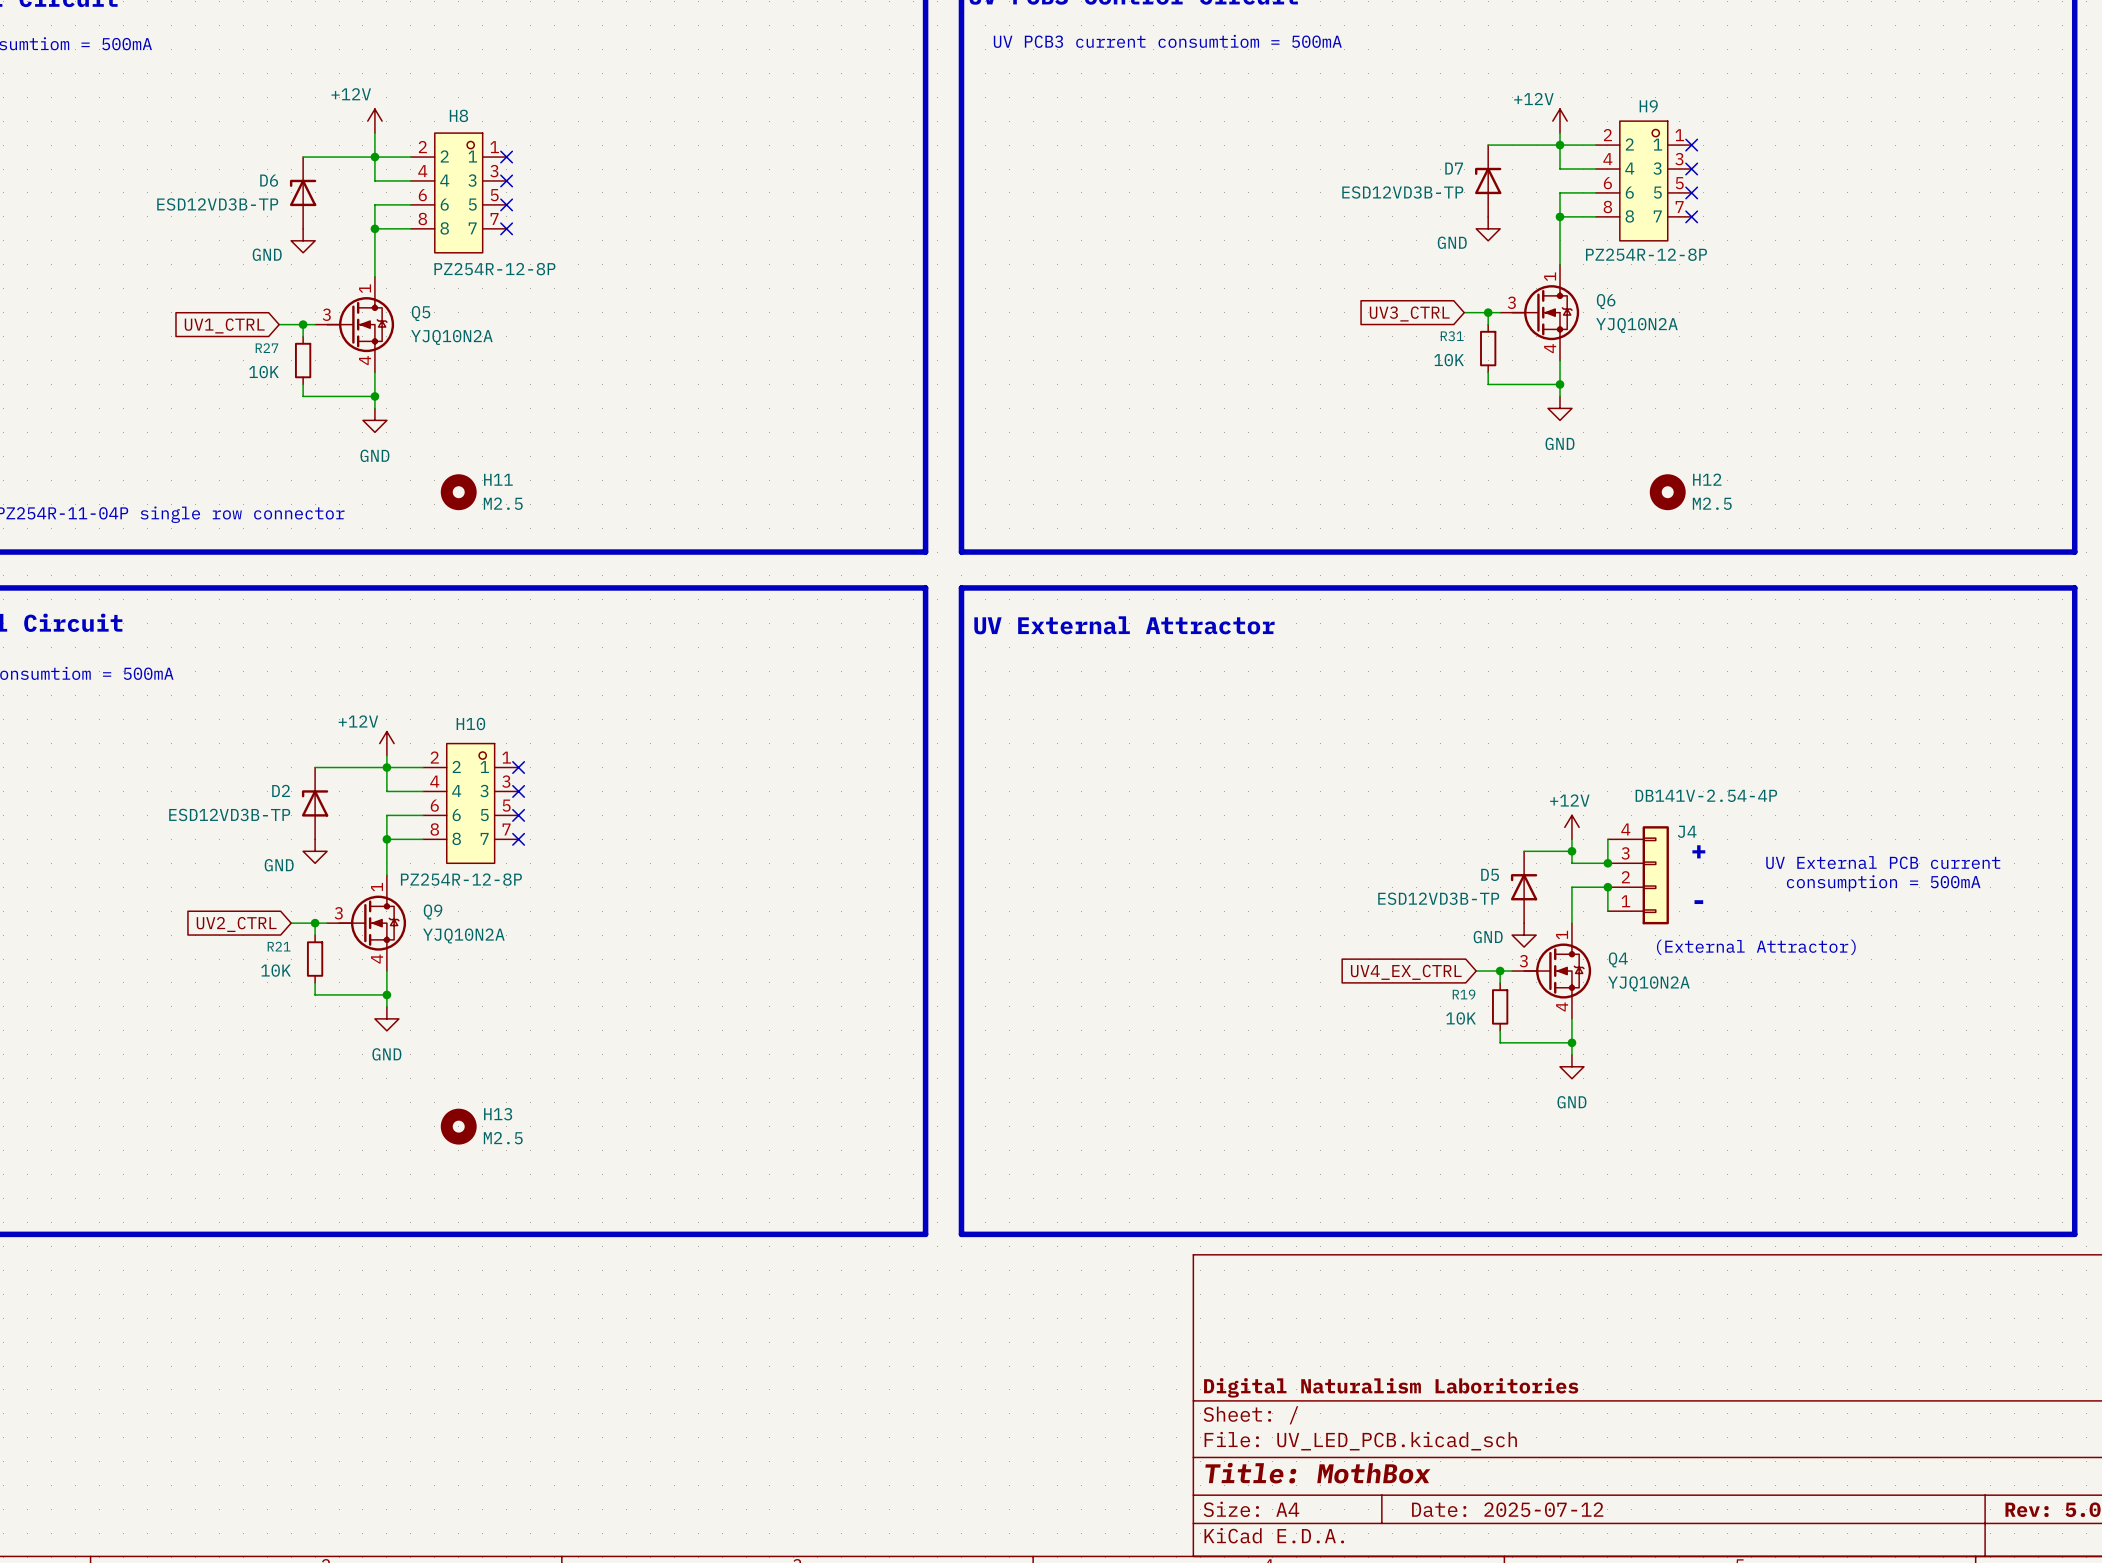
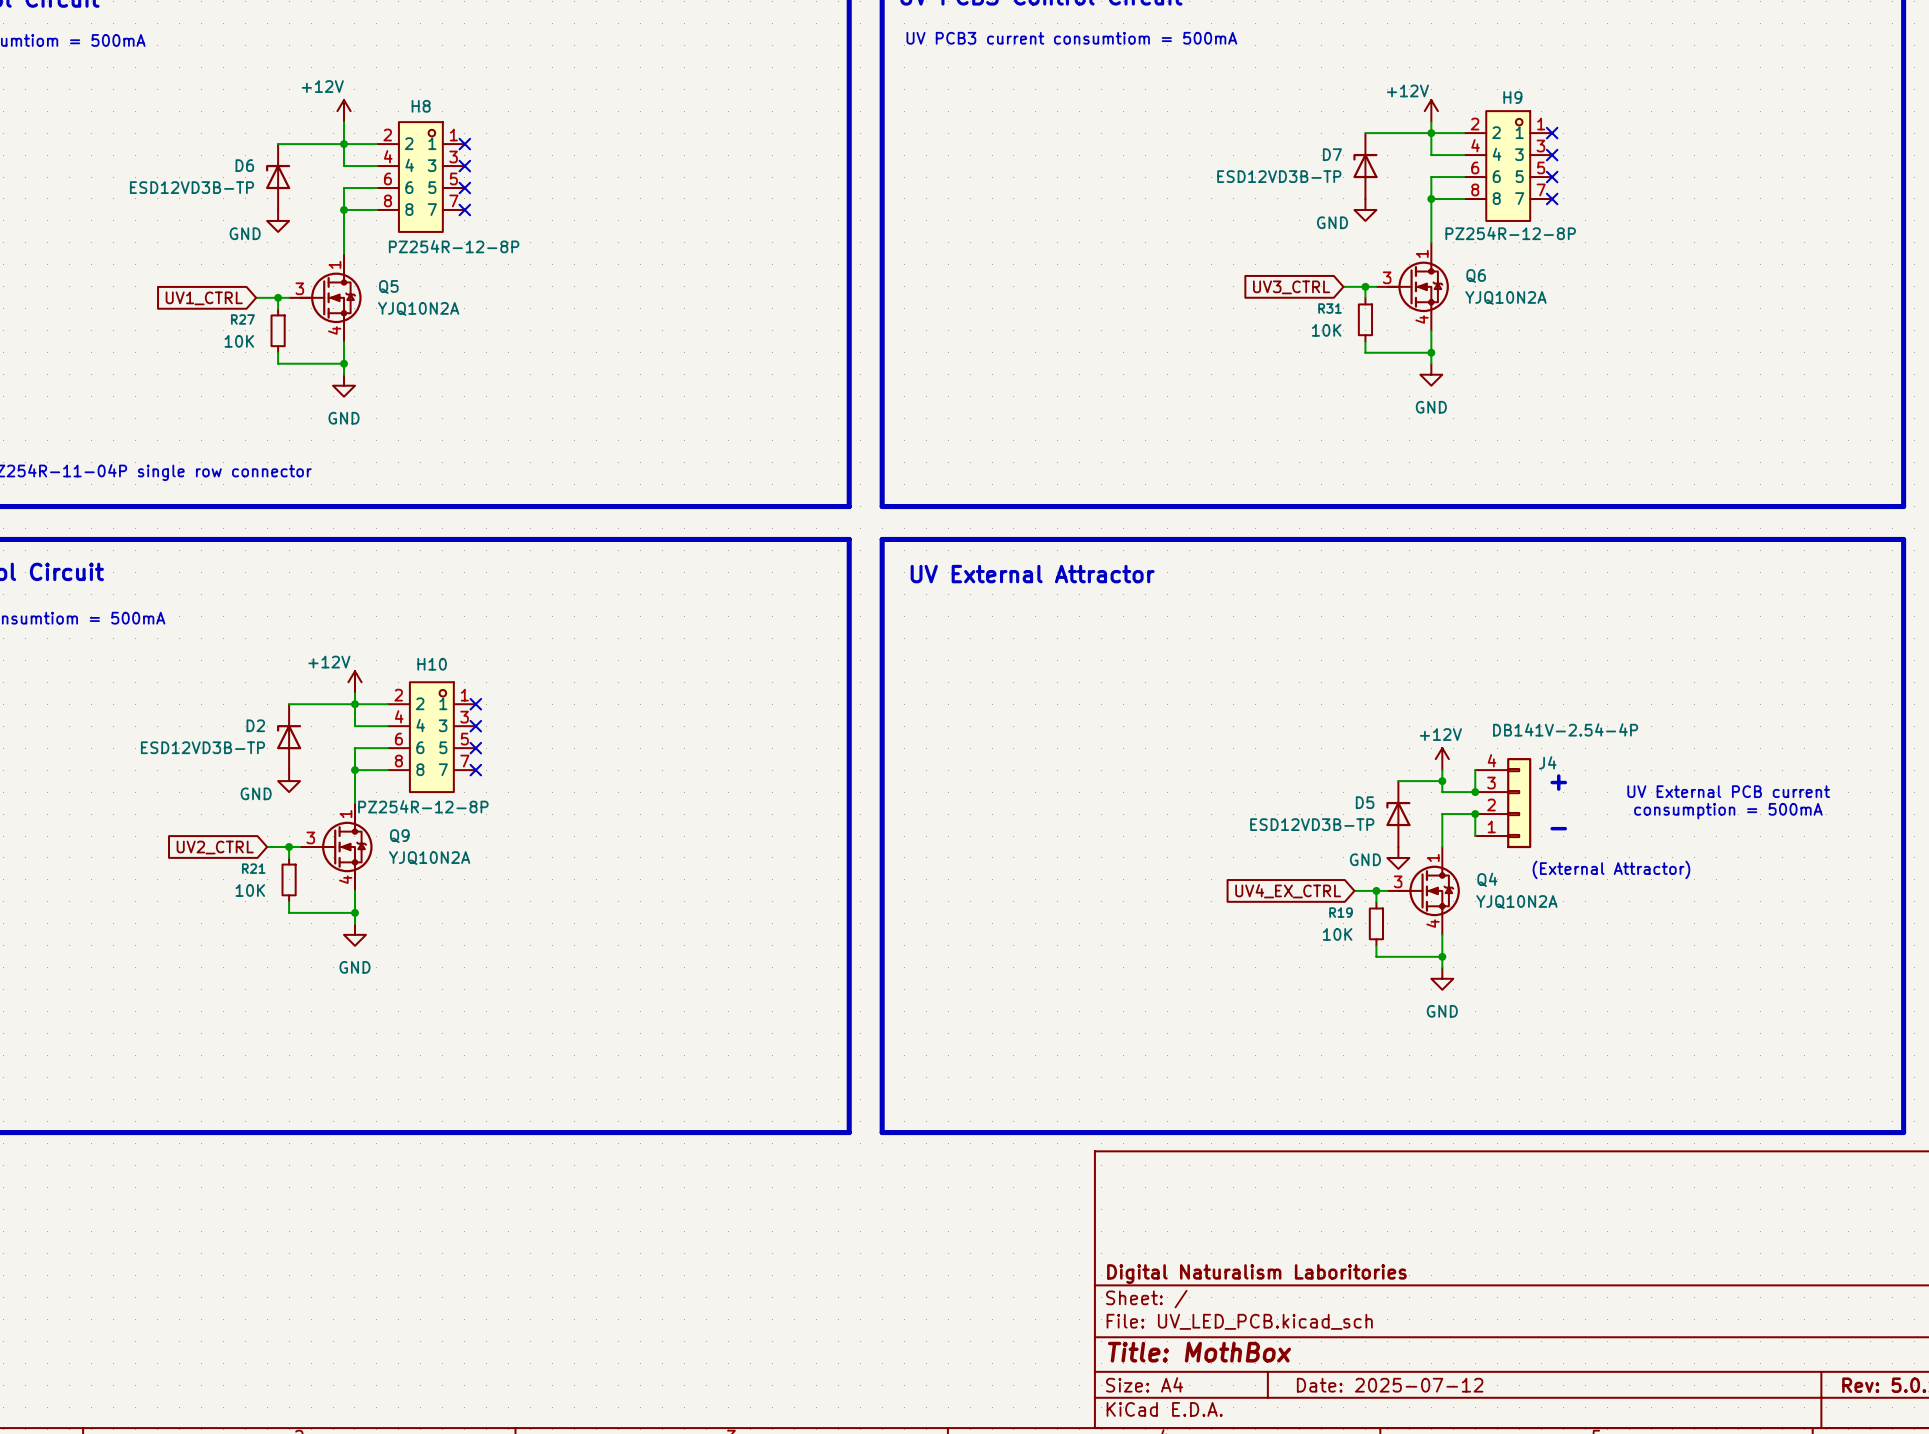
H11: M2.5 (458, 492) -> none
H12: M2.5 (1667, 492) -> none
H13: M2.5 (458, 1126) -> none

